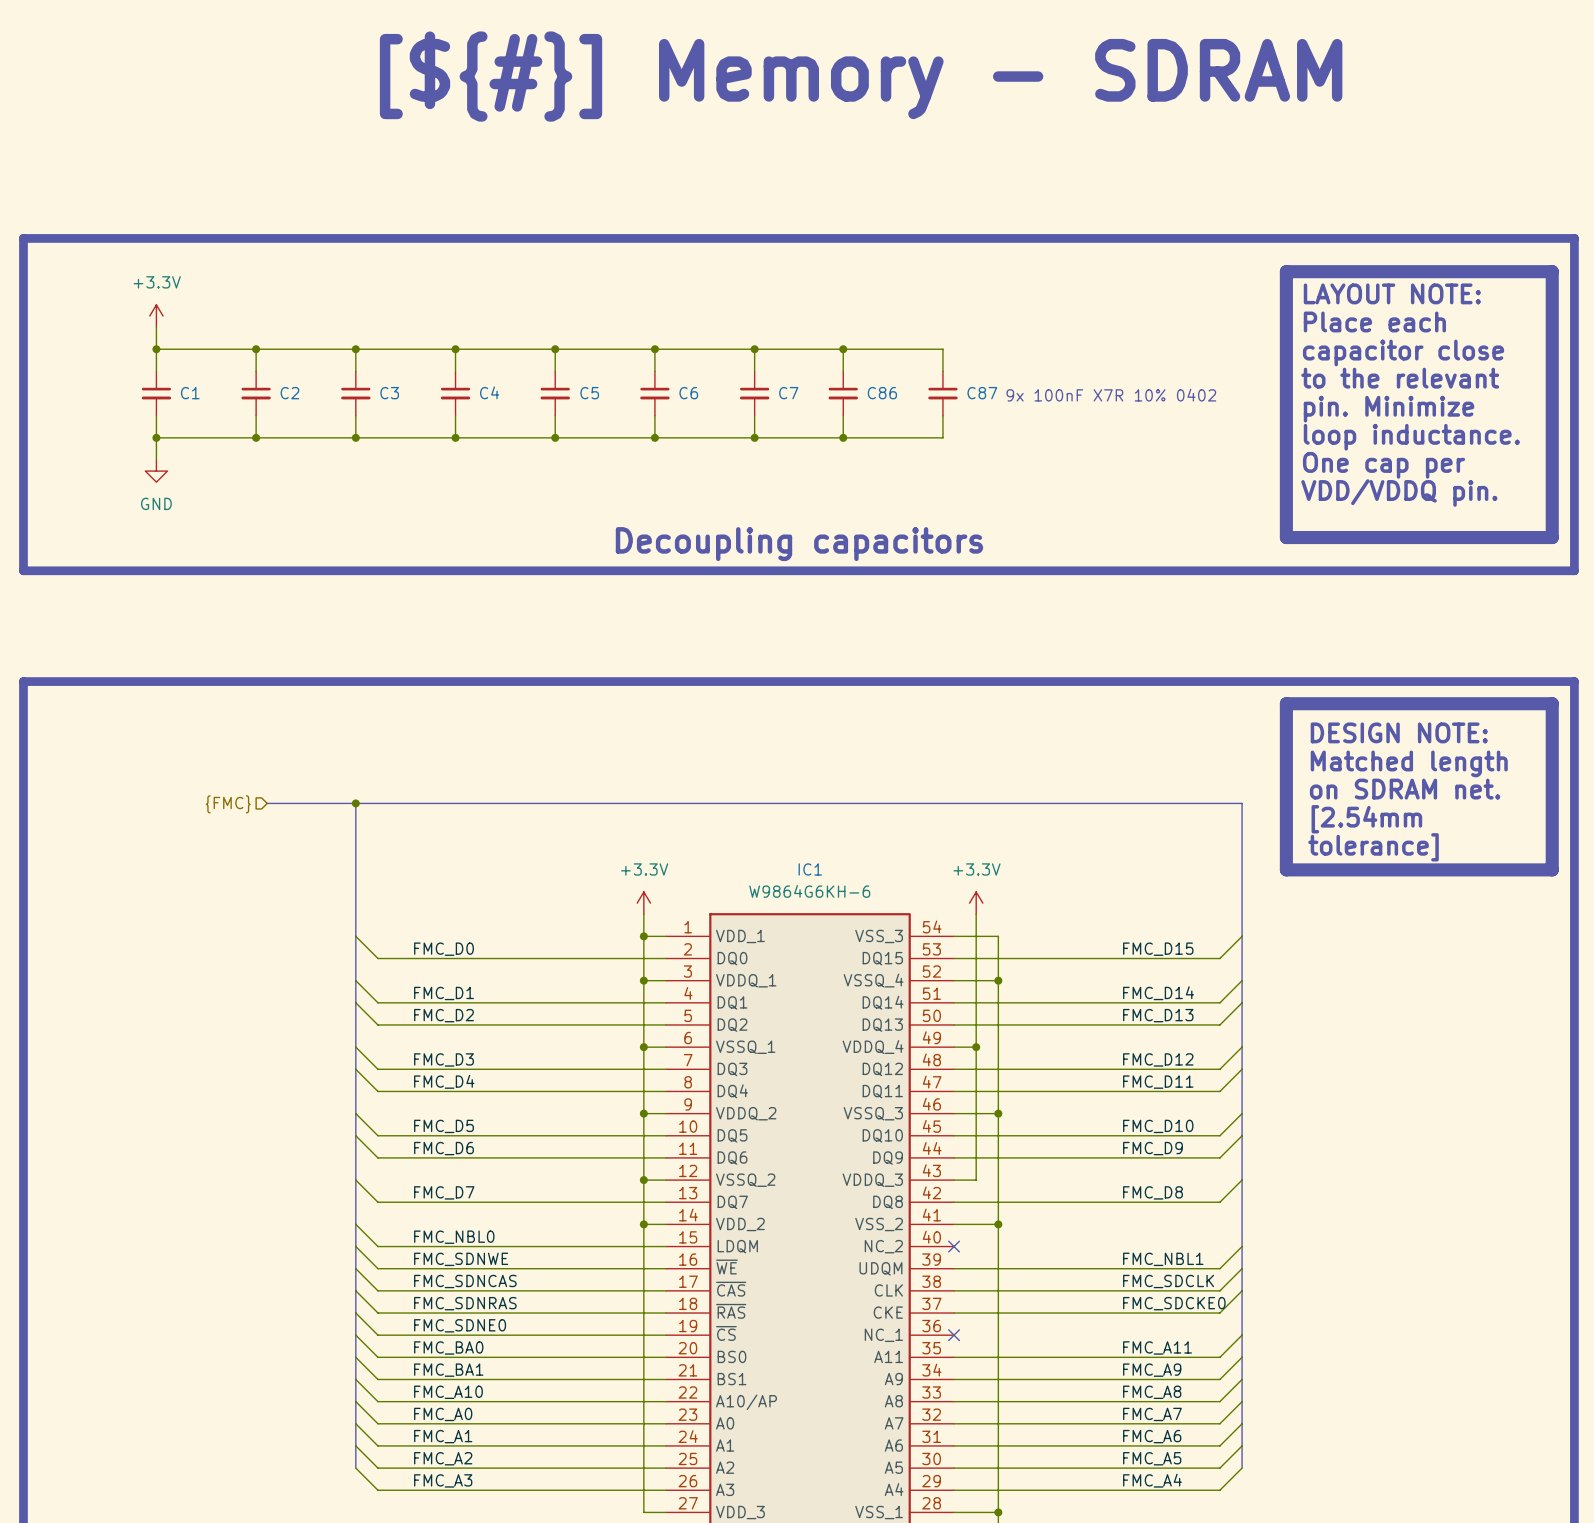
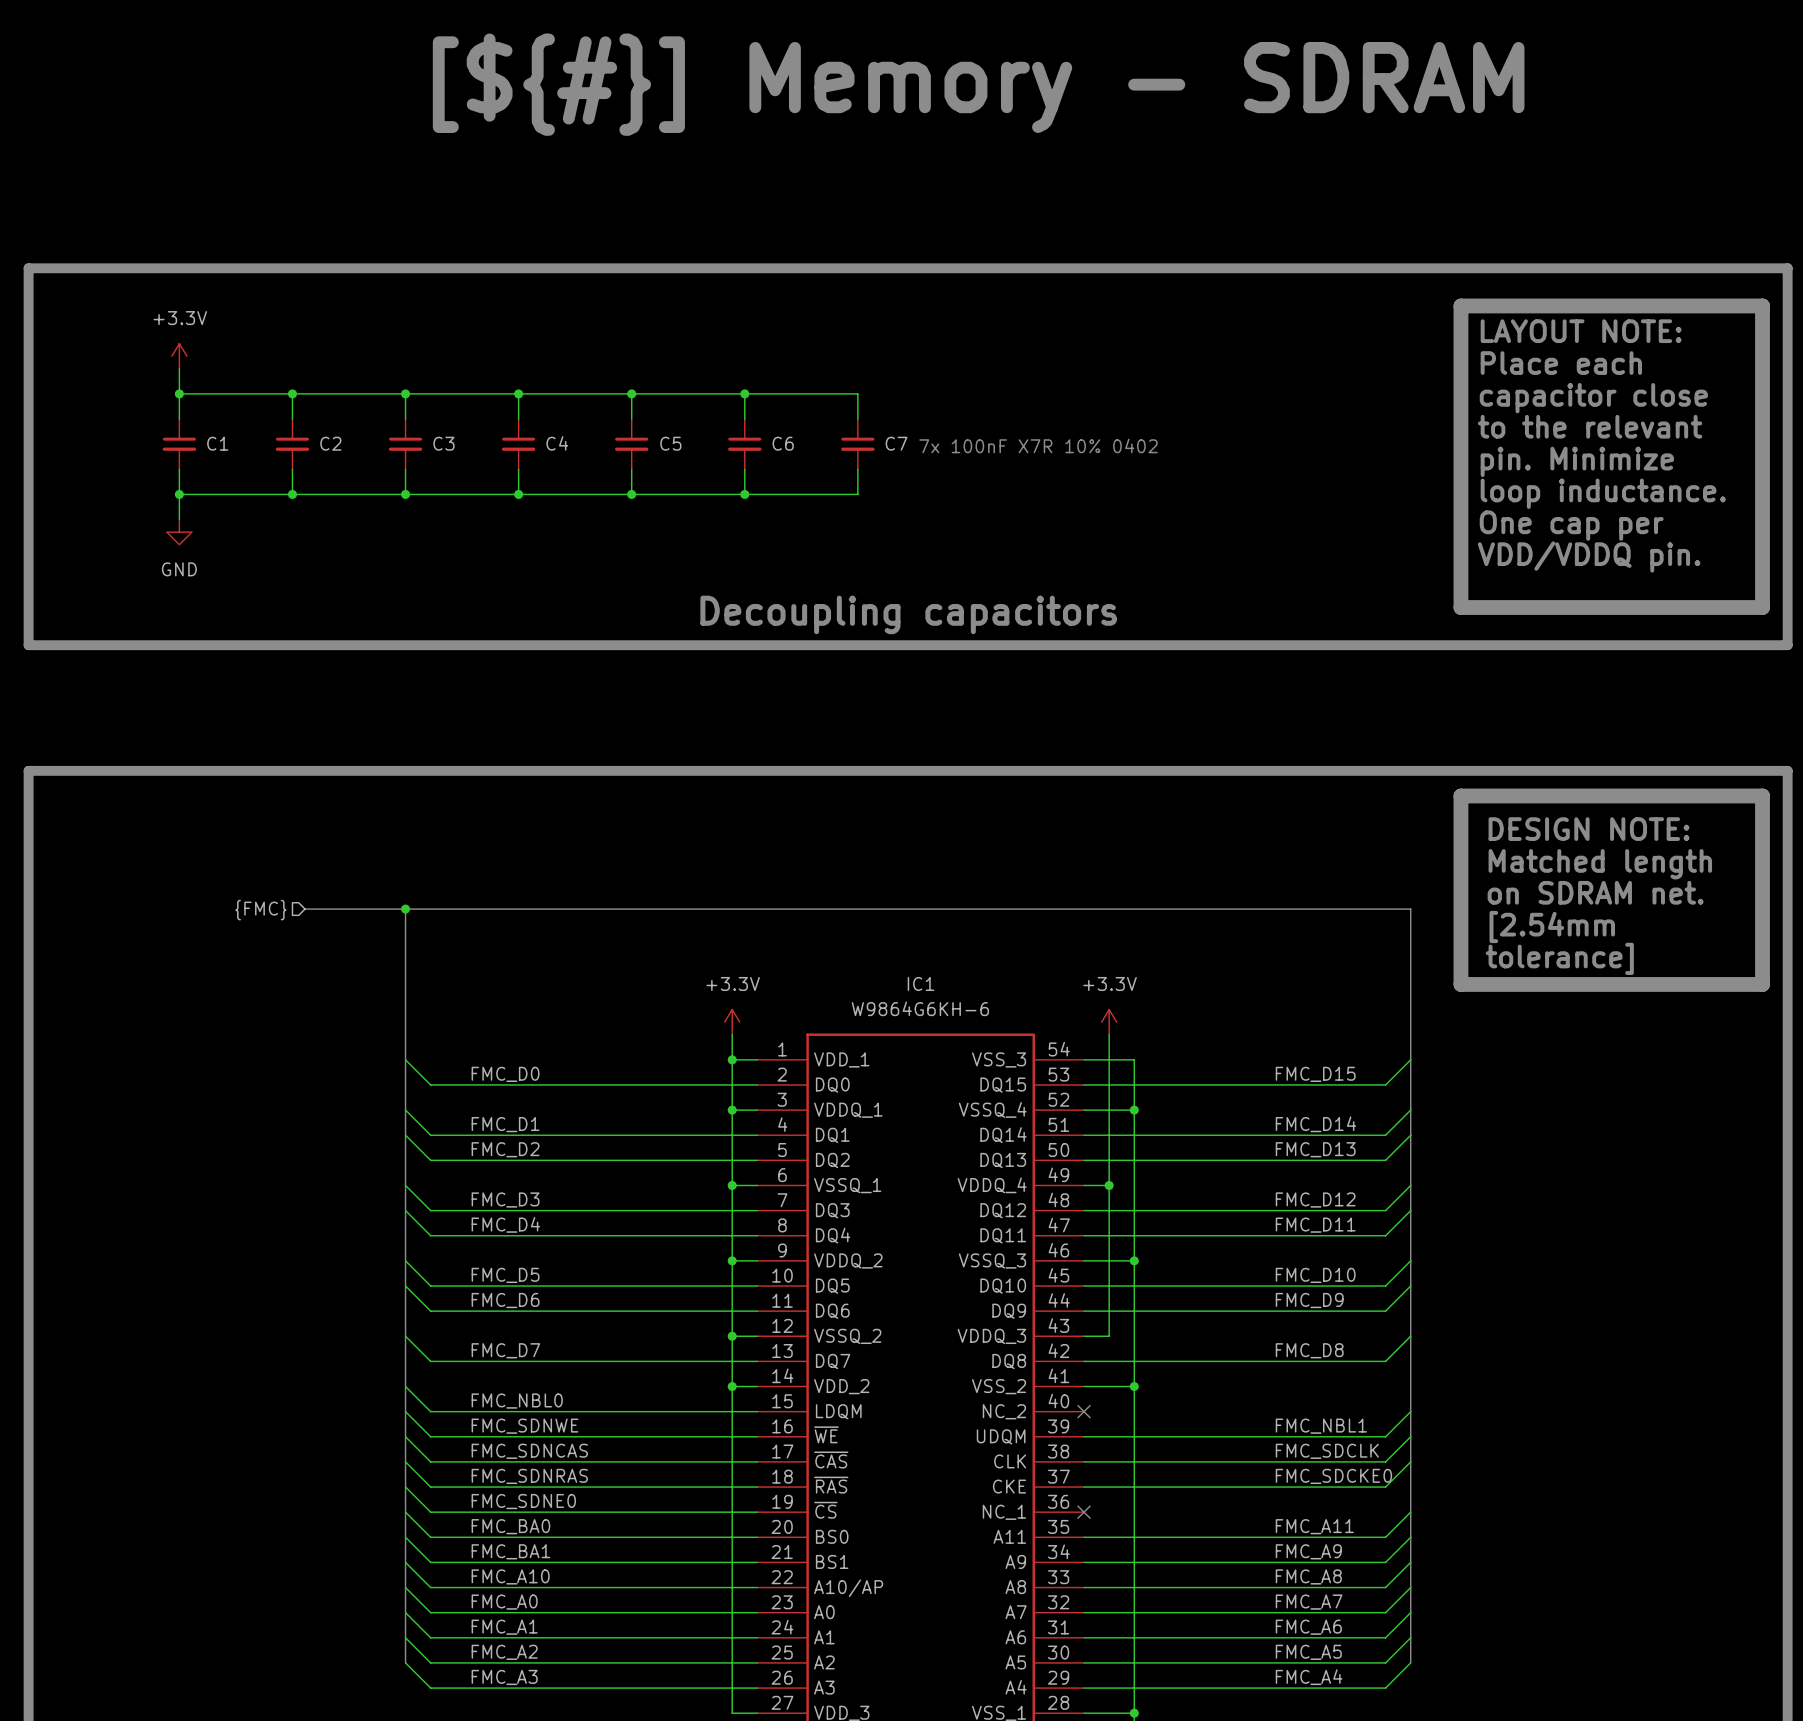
wire: (754, 349) (942, 349) (942, 371) -> none
junction: (754, 349) -> none
wire: (843, 349) (843, 371) -> none
junction: (843, 349) -> none
C86: (843, 393) -> none
C87: (942, 393) -> none
text: 9x 100nF X7R 10% 0402 (1111, 395) -> 7x 100nF X7R 10% 0402 (1038, 445)
wire: (843, 415) (843, 437) -> none
wire: (942, 415) (942, 437) (754, 437) -> none
junction: (754, 437) -> none
junction: (843, 437) -> none

